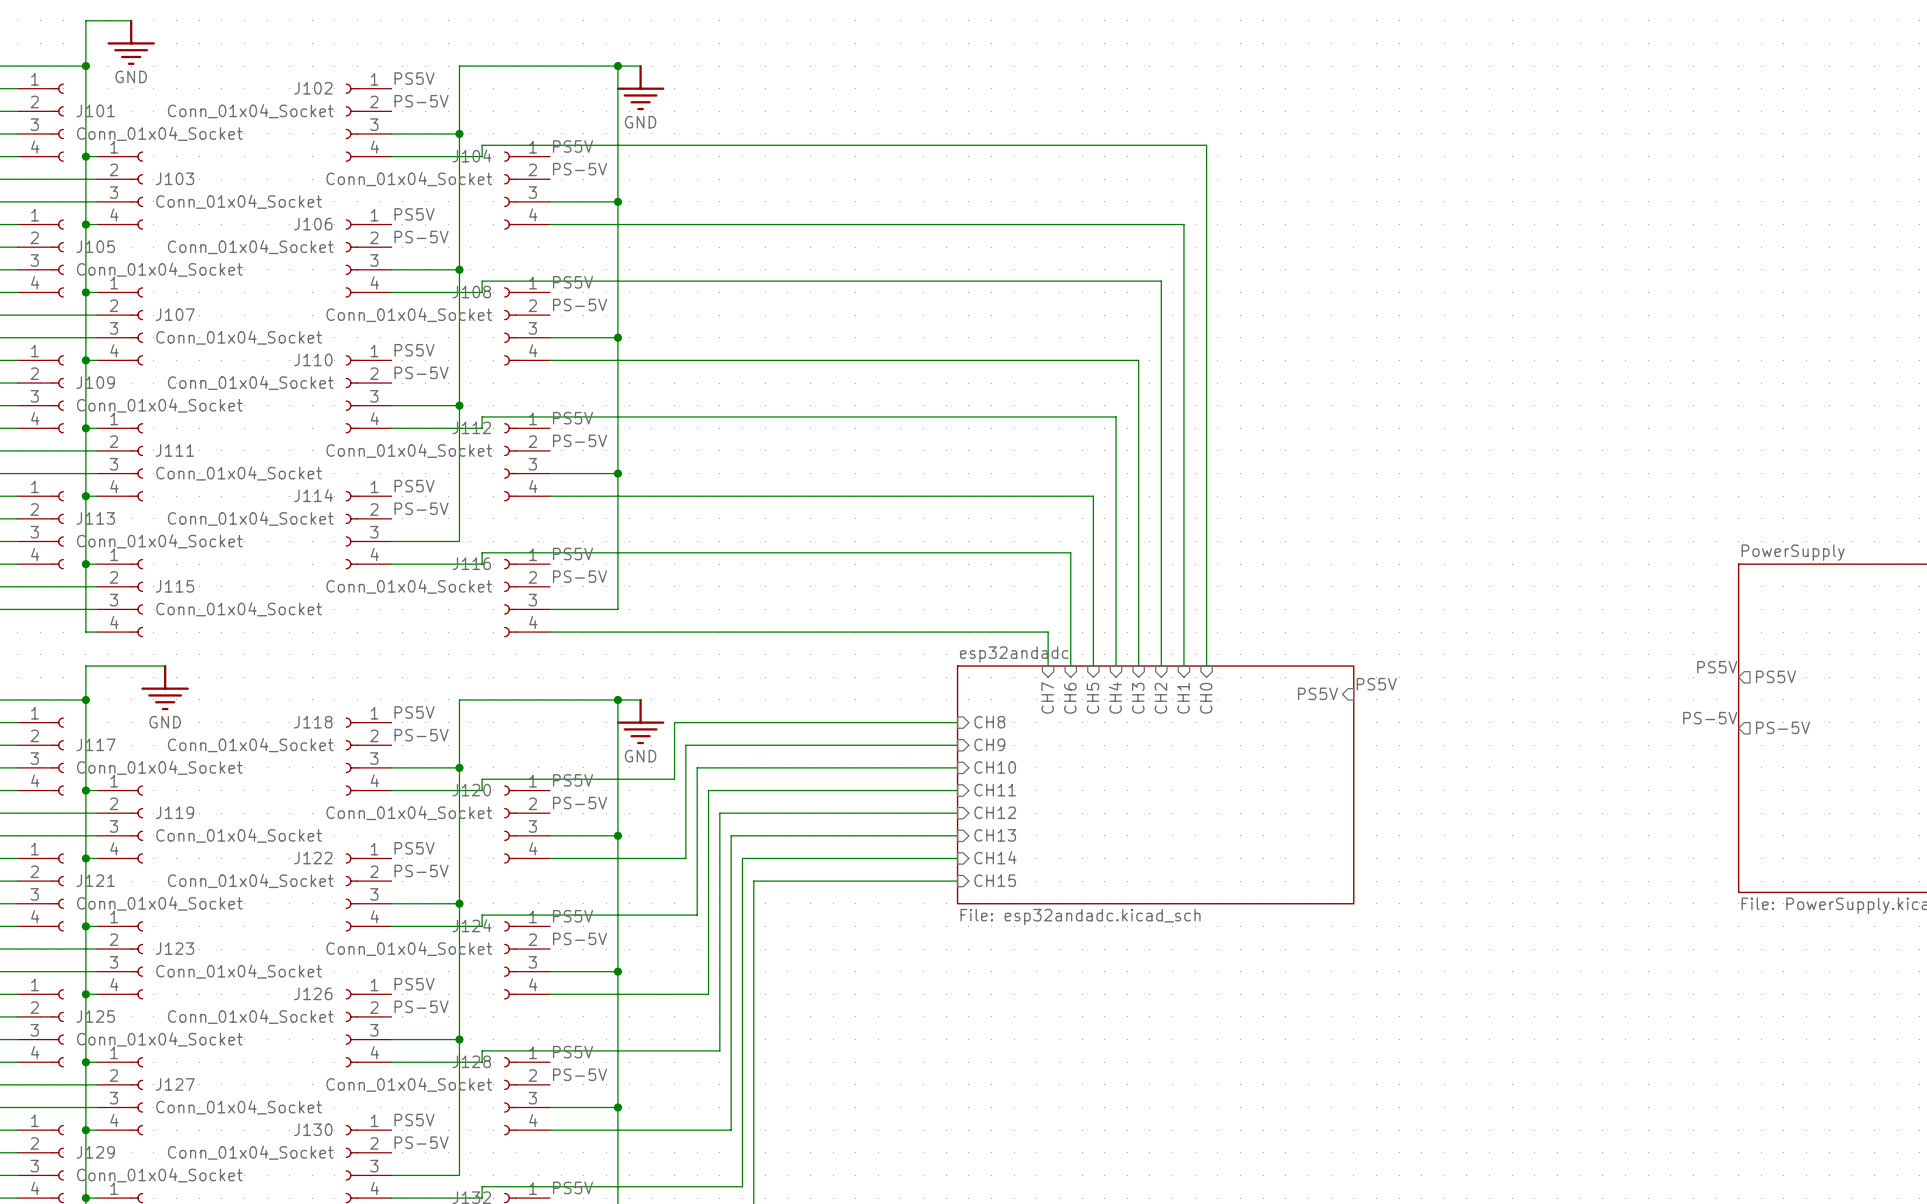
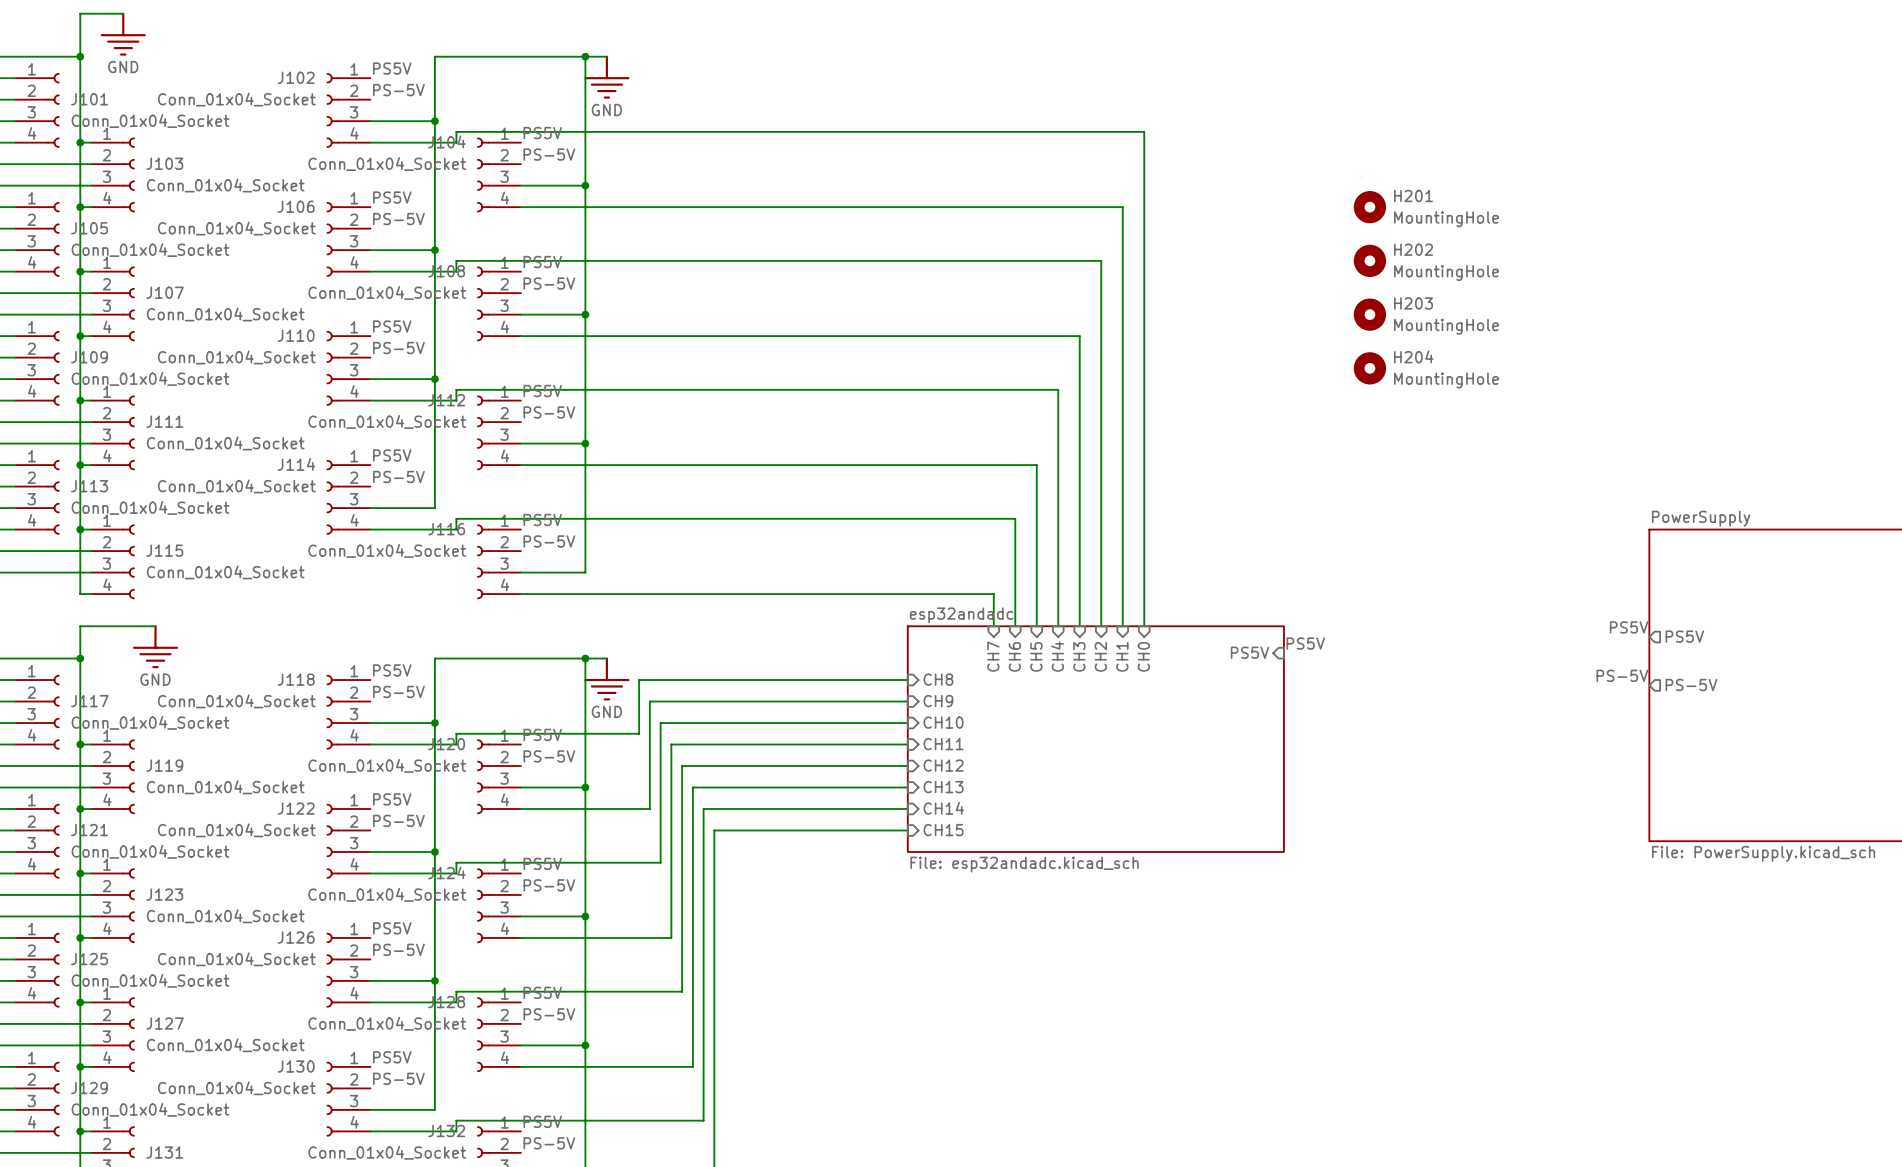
H201: none -> MountingHole (1369, 207)
H202: none -> MountingHole (1369, 260)
H203: none -> MountingHole (1369, 314)
H204: none -> MountingHole (1369, 368)

